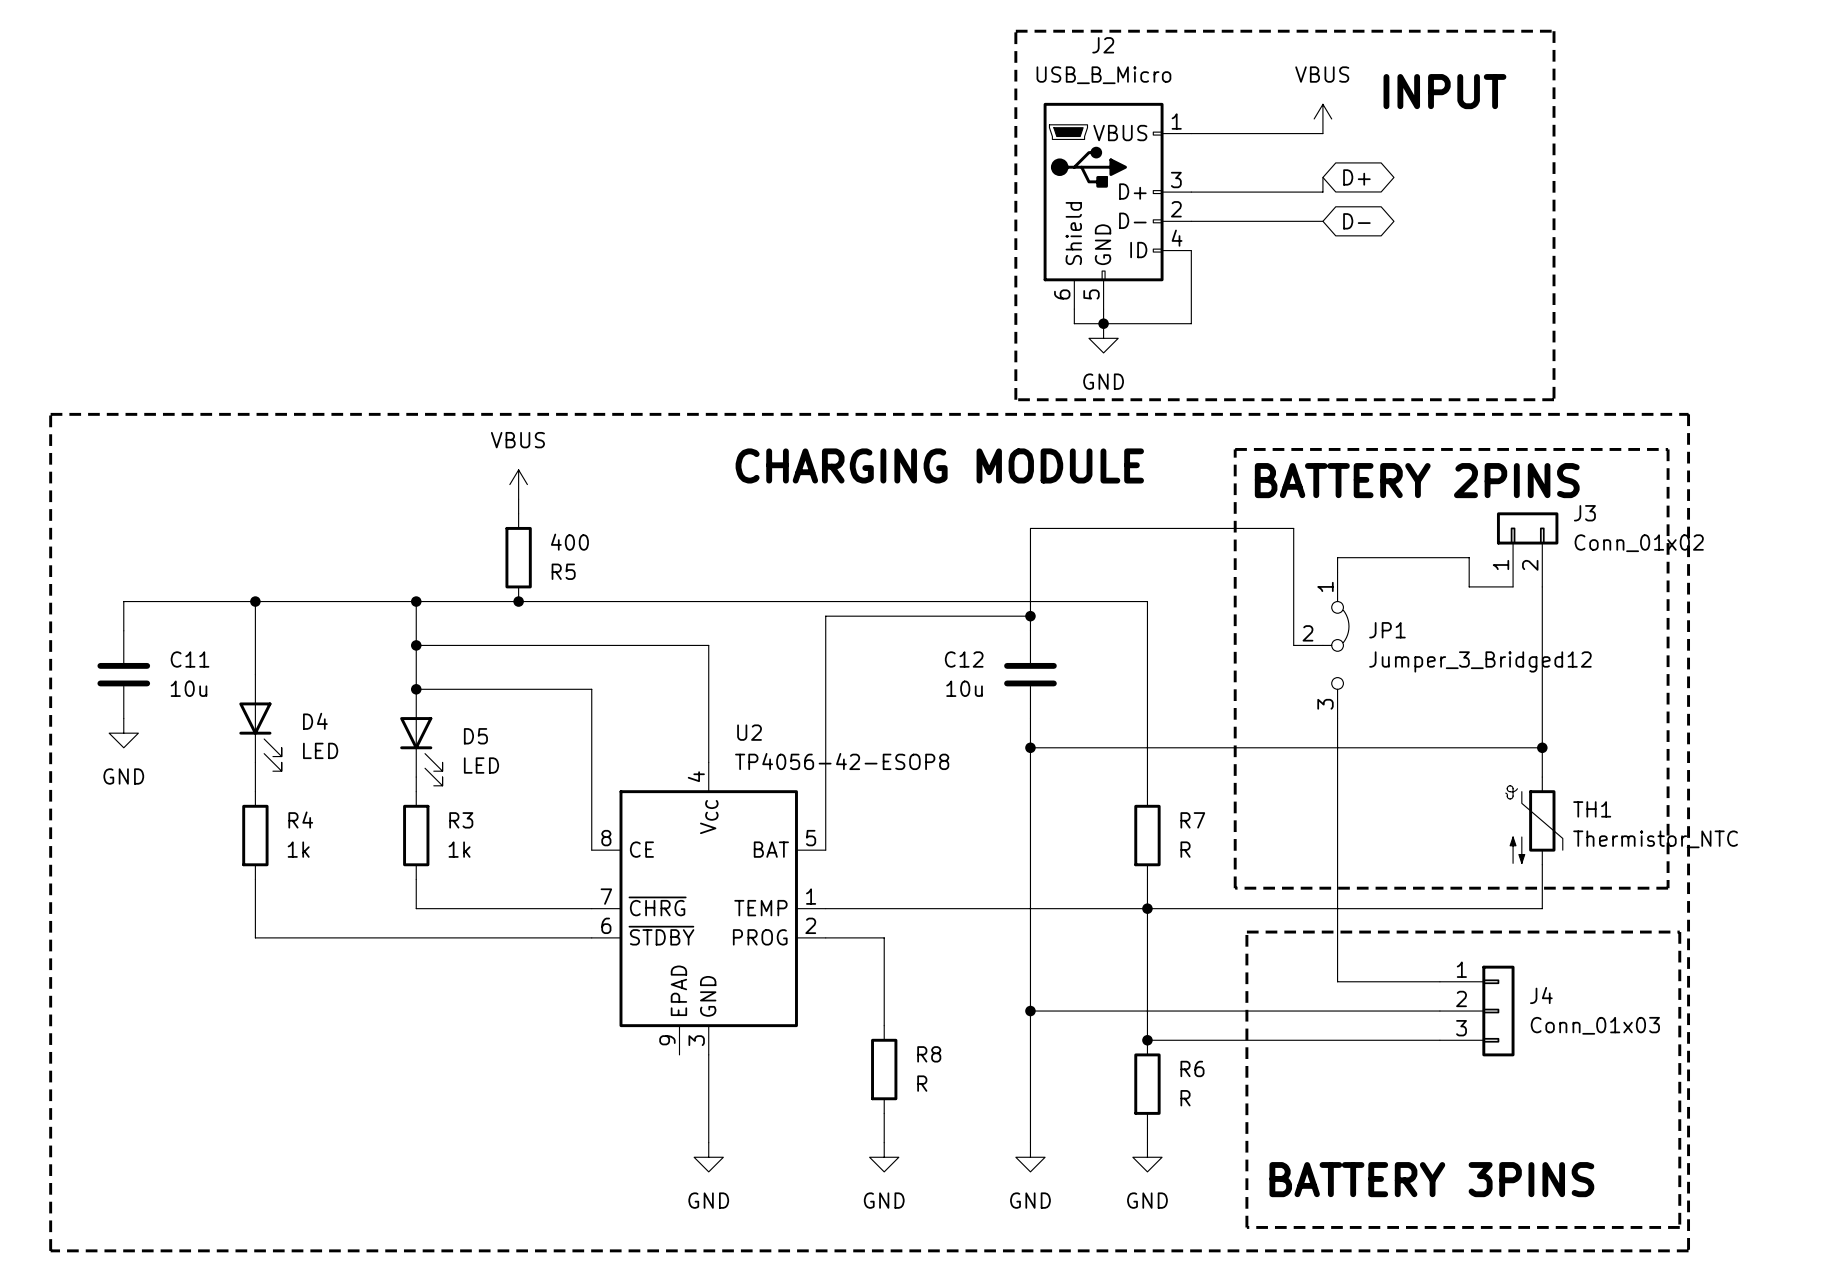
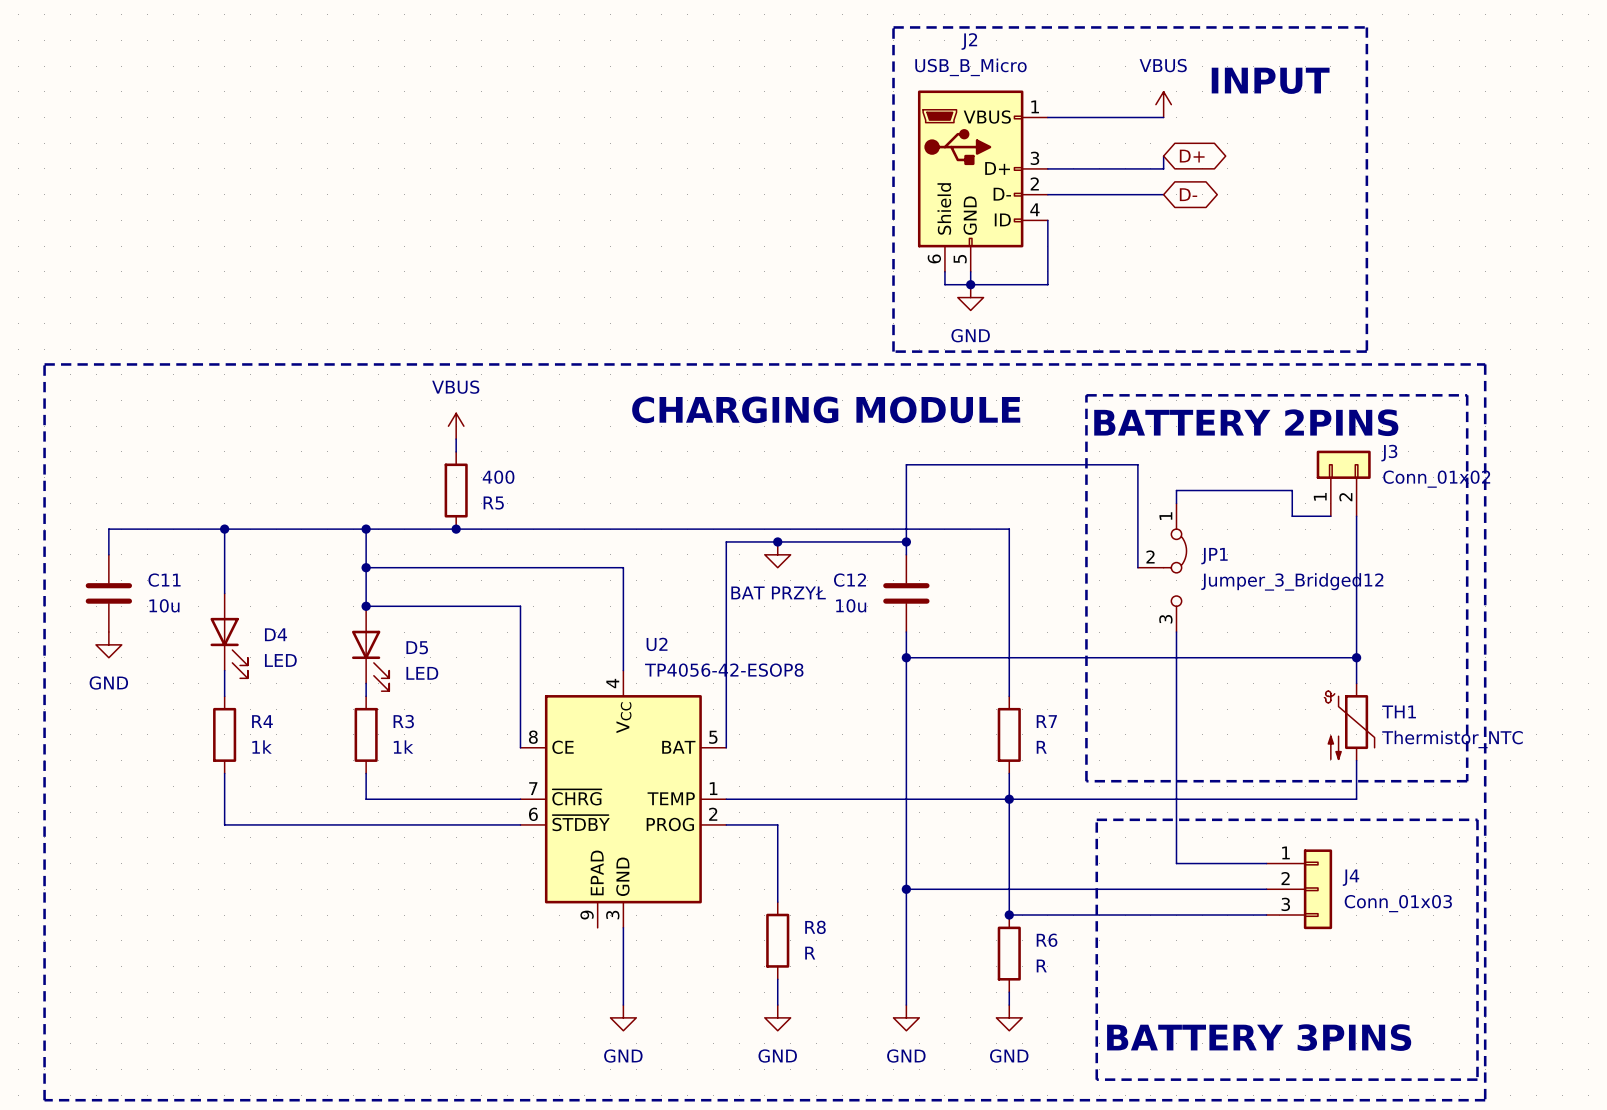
junction: none -> (777, 541)
power symbol: none -> BAT PRZYŁ (777, 554)

